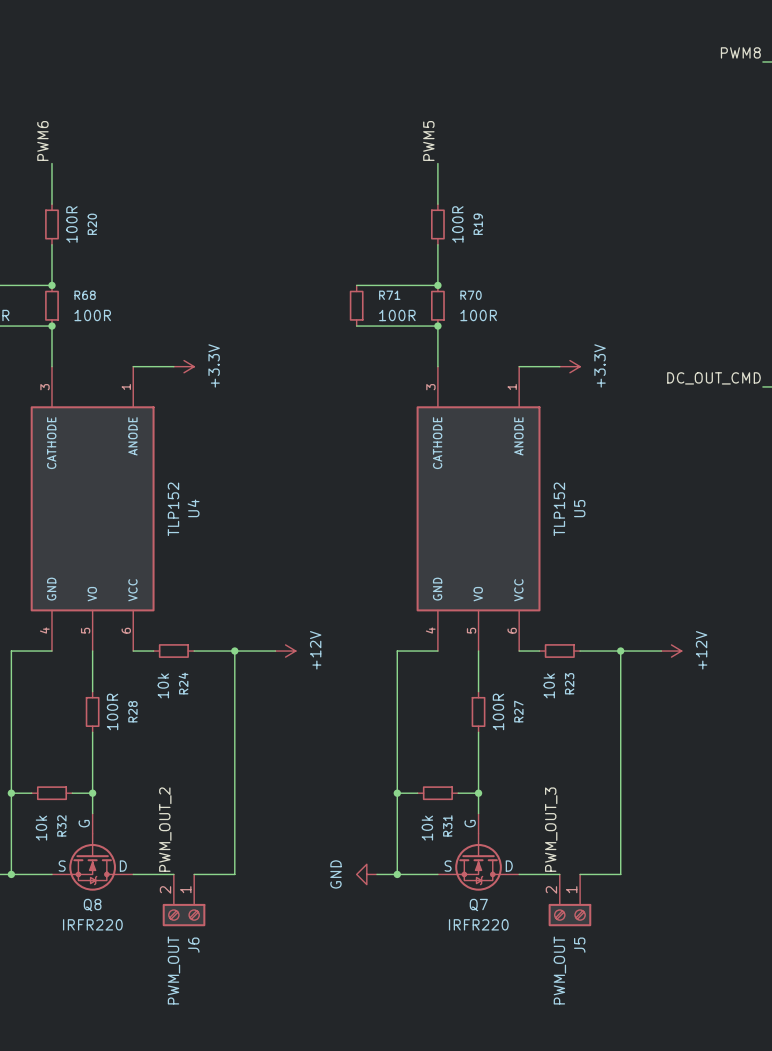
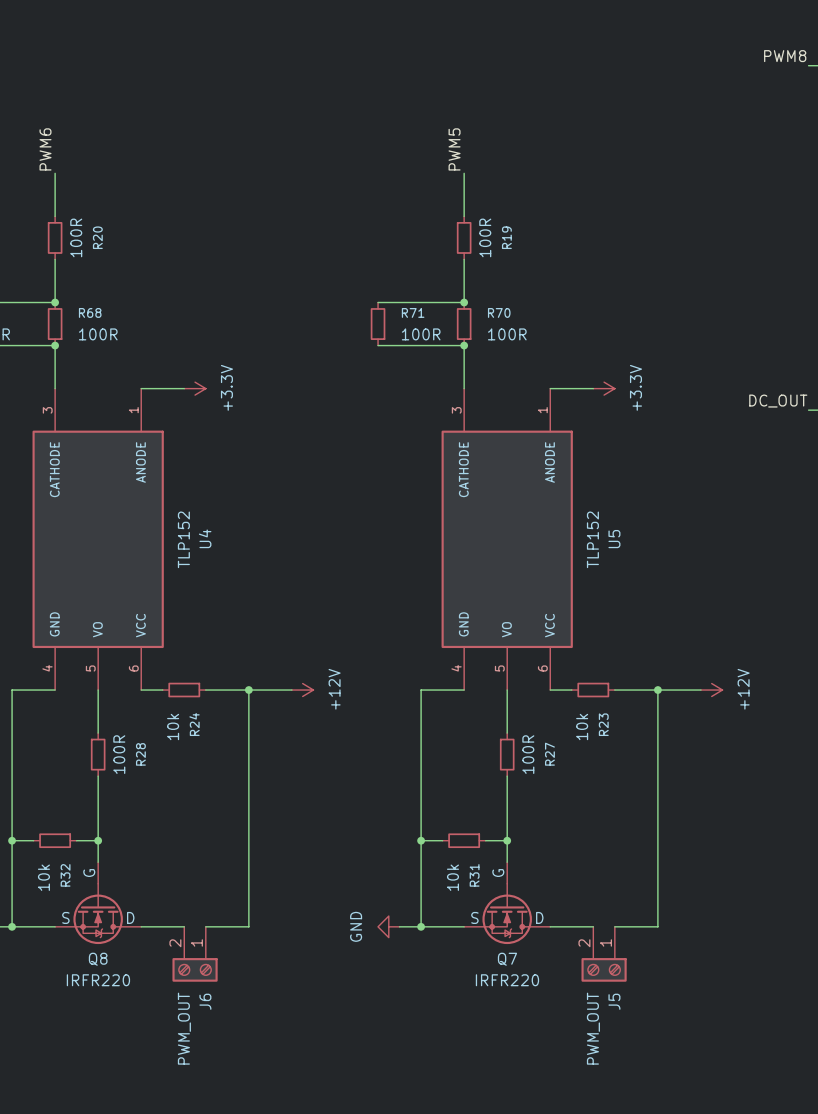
label: DC_OUT_CMD (713, 378) -> DC_OUT (778, 401)
label: PWM_OUT_2 (165, 829) -> none
label: PWM_OUT_3 (551, 829) -> none

